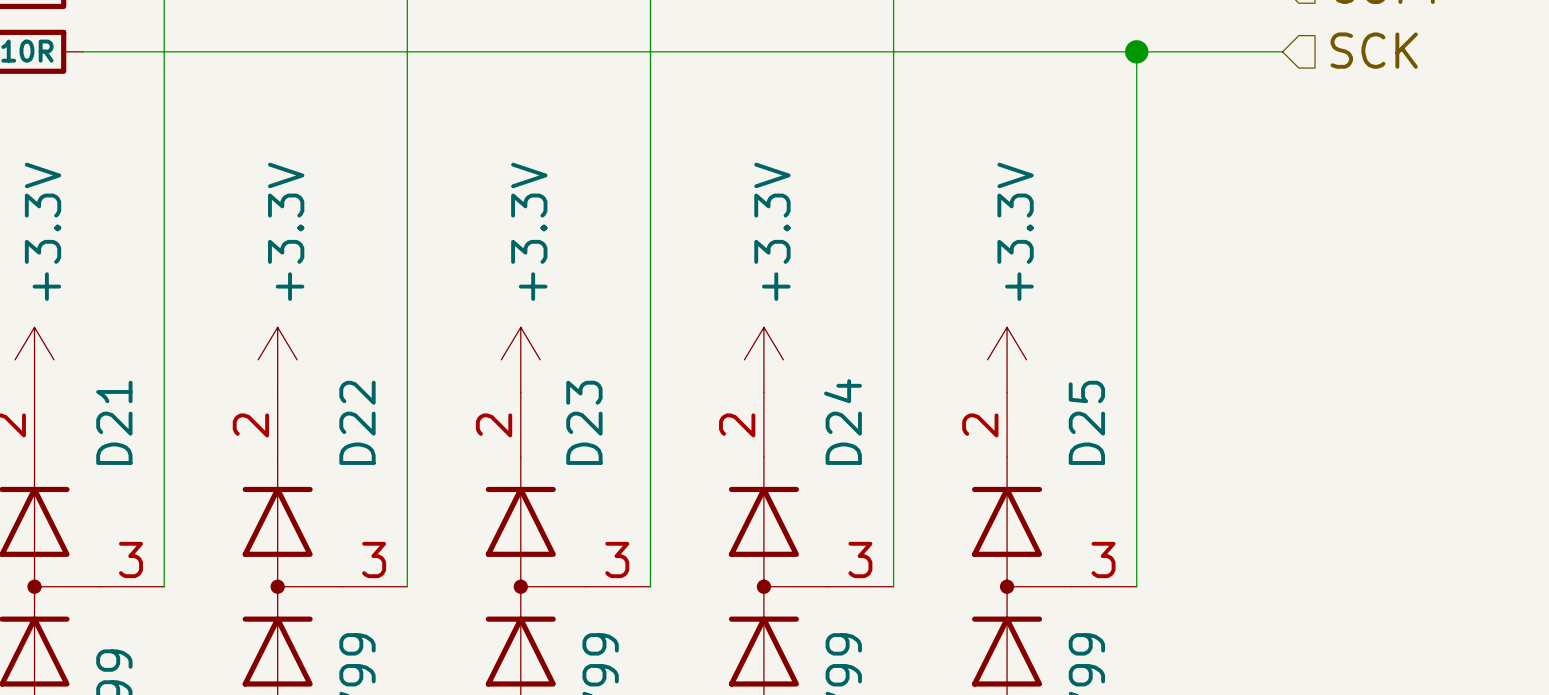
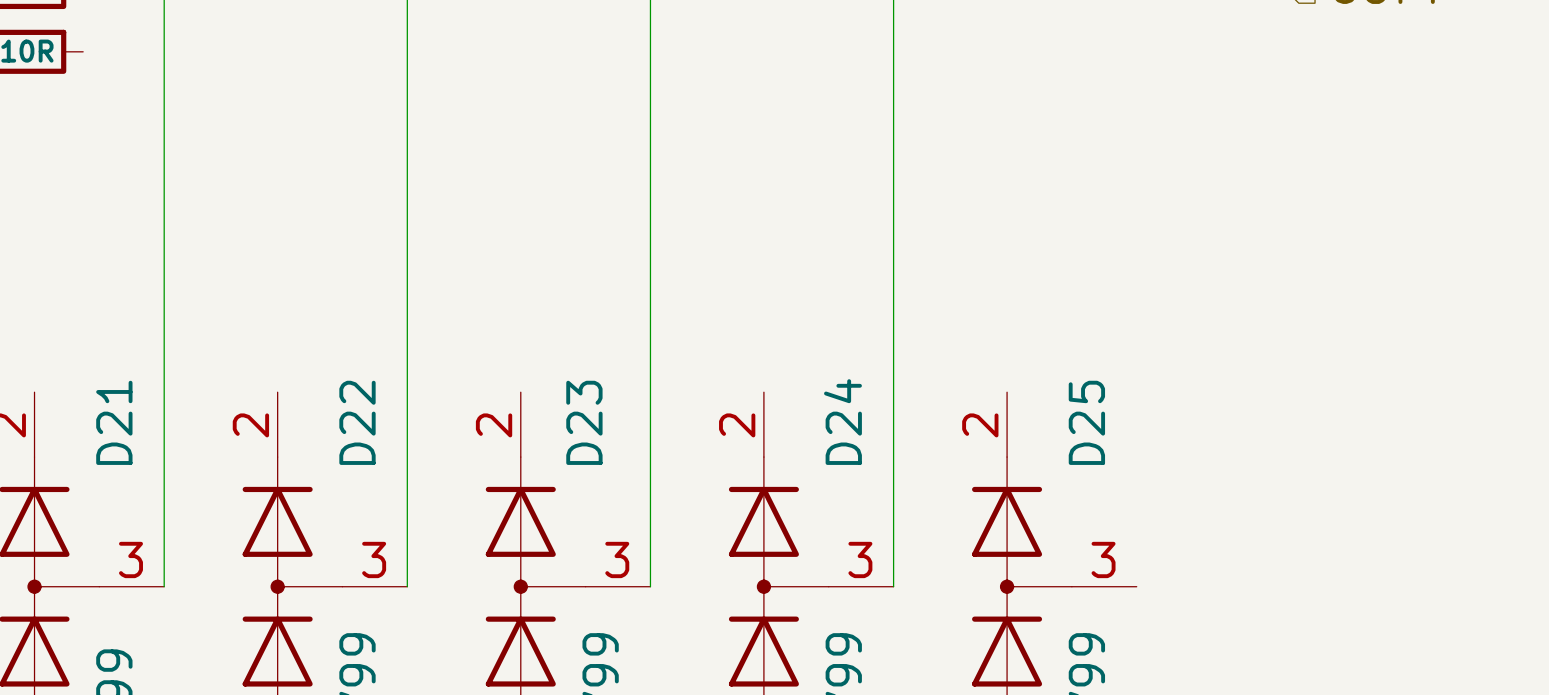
hierarchical label: SCK (1374, 50) -> none
wire: (83, 51) (1282, 51) -> none
wire: (1136, 51) (1136, 586) -> none
junction: (1136, 51) -> none
power symbol: +3.3V (34, 359) -> none
power symbol: +3.3V (277, 359) -> none
power symbol: +3.3V (520, 359) -> none
power symbol: +3.3V (763, 359) -> none
power symbol: +3.3V (1007, 359) -> none

